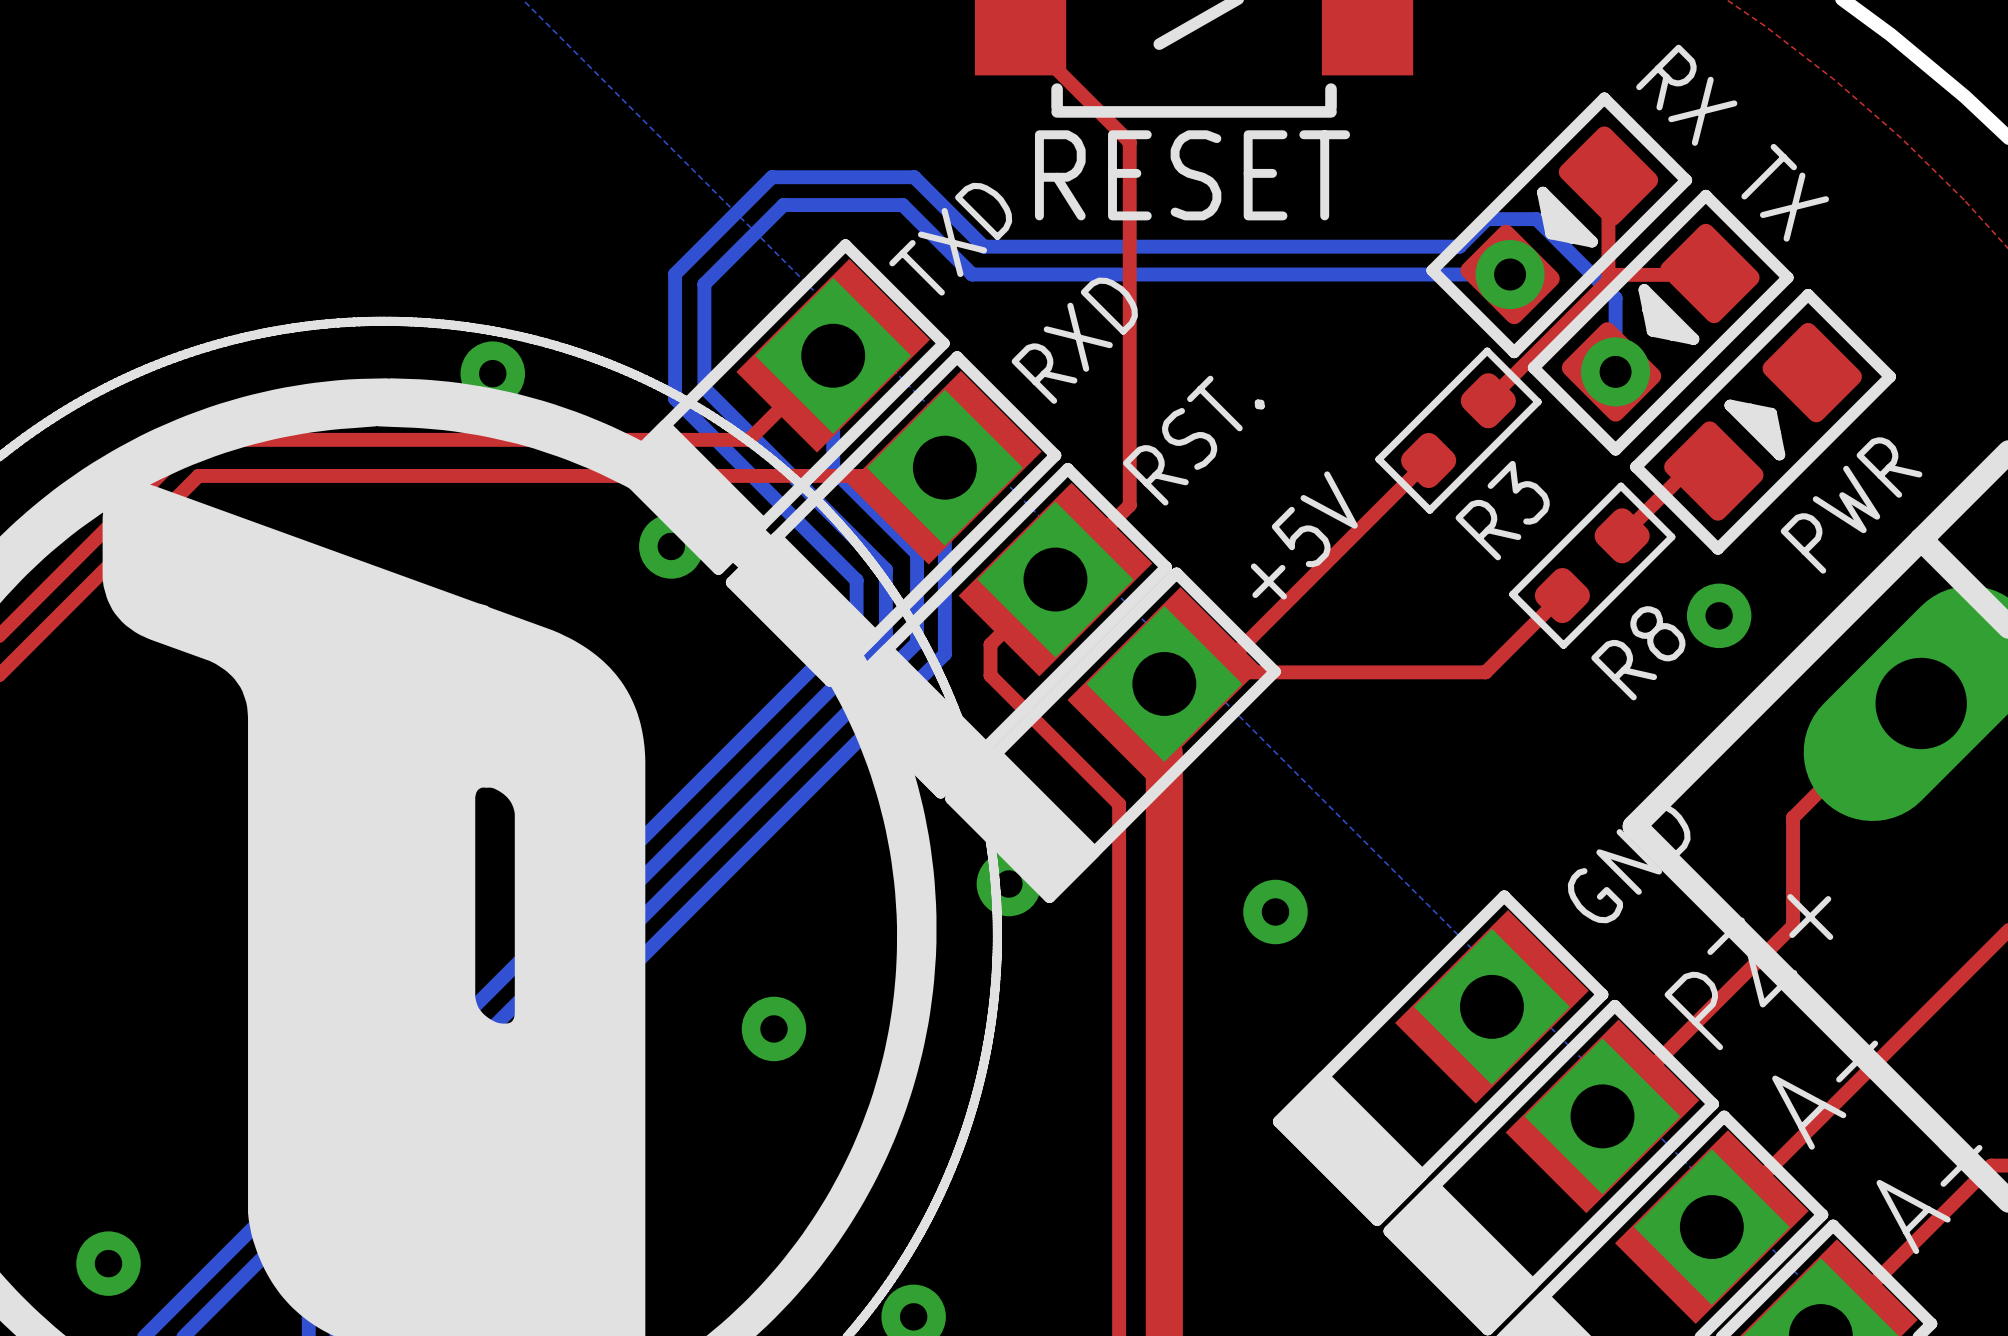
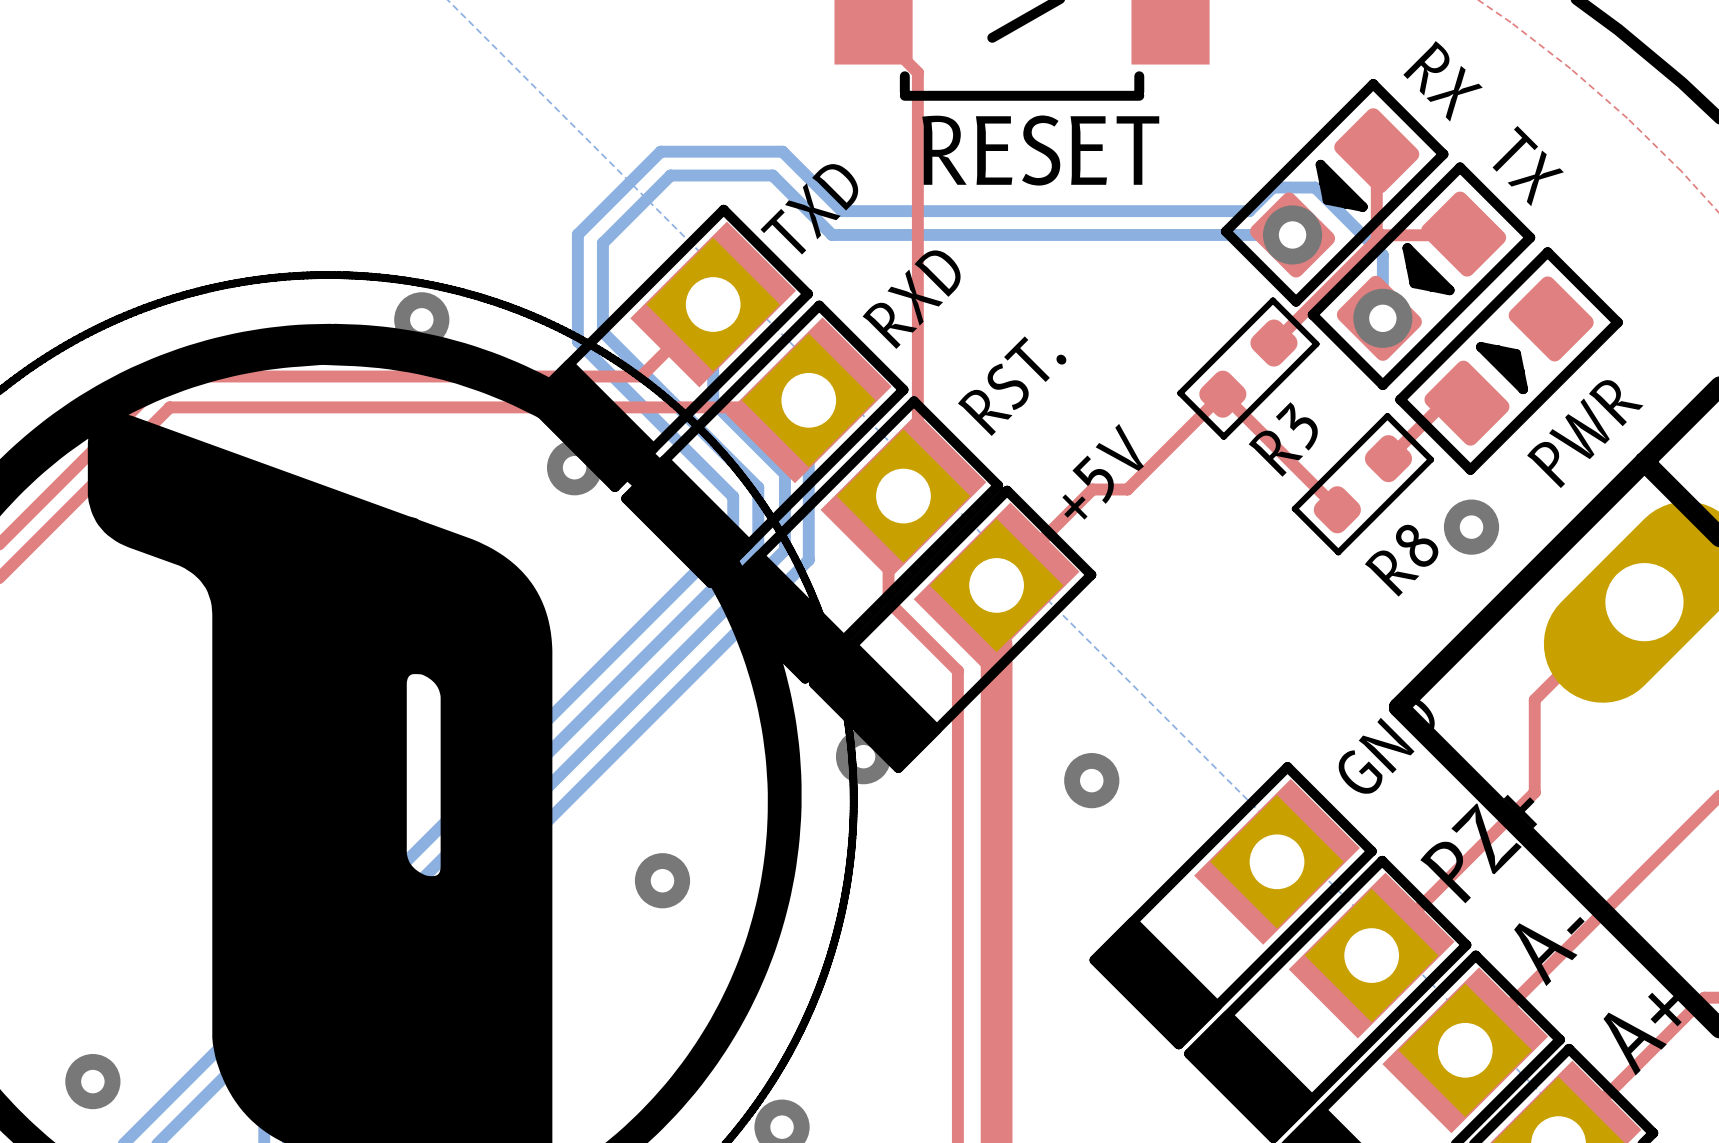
top track: (1072, 84) (1129, 142) (1129, 505) (1072, 562) -> (917, 72) (917, 481)
top track: (1317, 571) (1216, 672) -> (1127, 489) (1092, 489) (1006, 575)
top track: (1055, 579) (990, 644) (990, 675) (1119, 804) -> (903, 496) (903, 506) (888, 521) (888, 601) (957, 670) (957, 688)
top track: (1562, 595) (1485, 672) (1175, 672) -> (1337, 508) (1222, 394)

